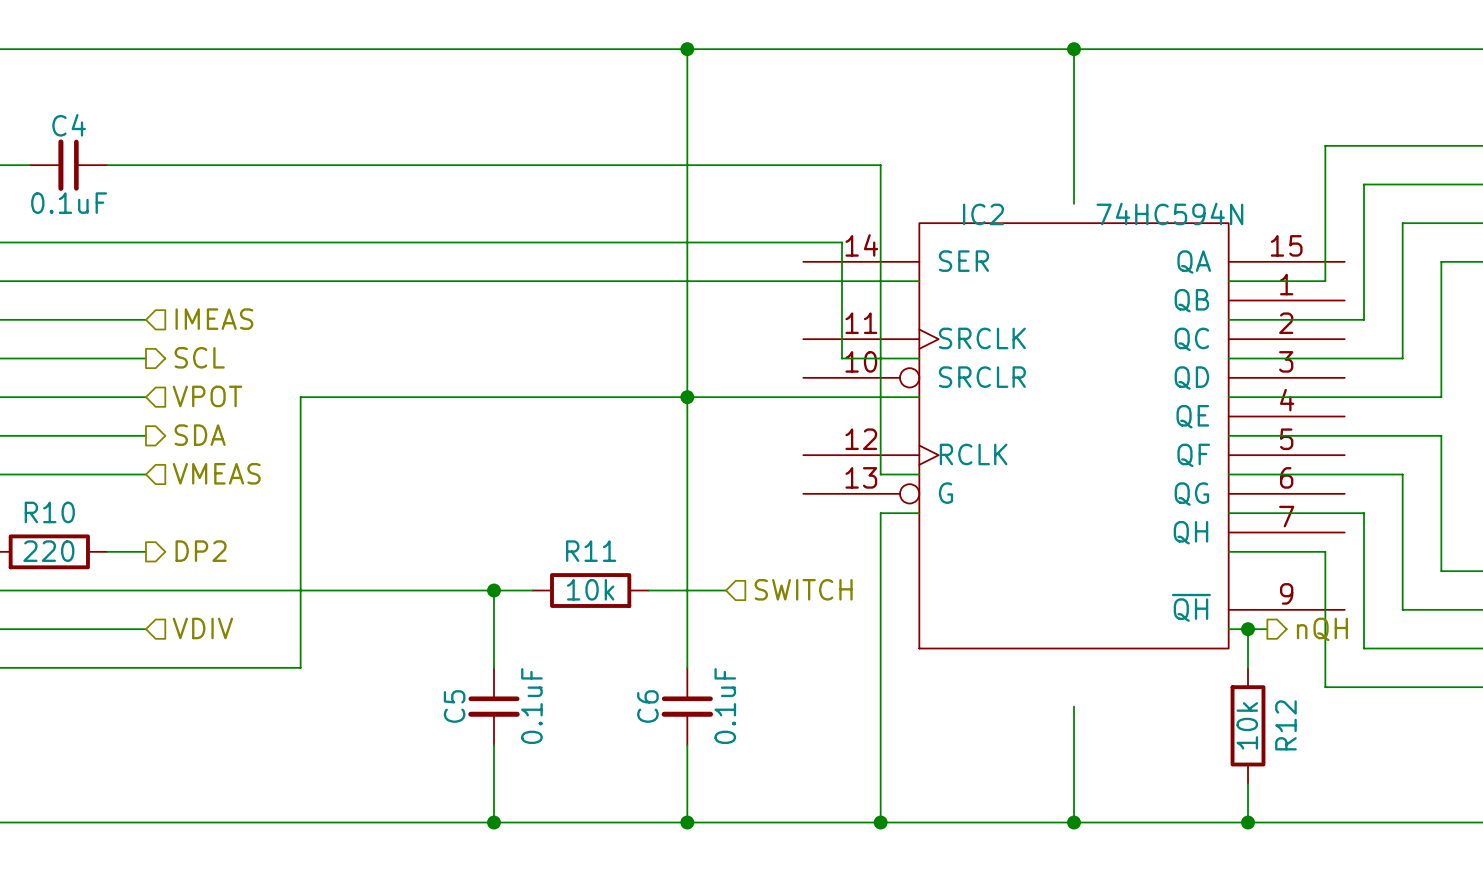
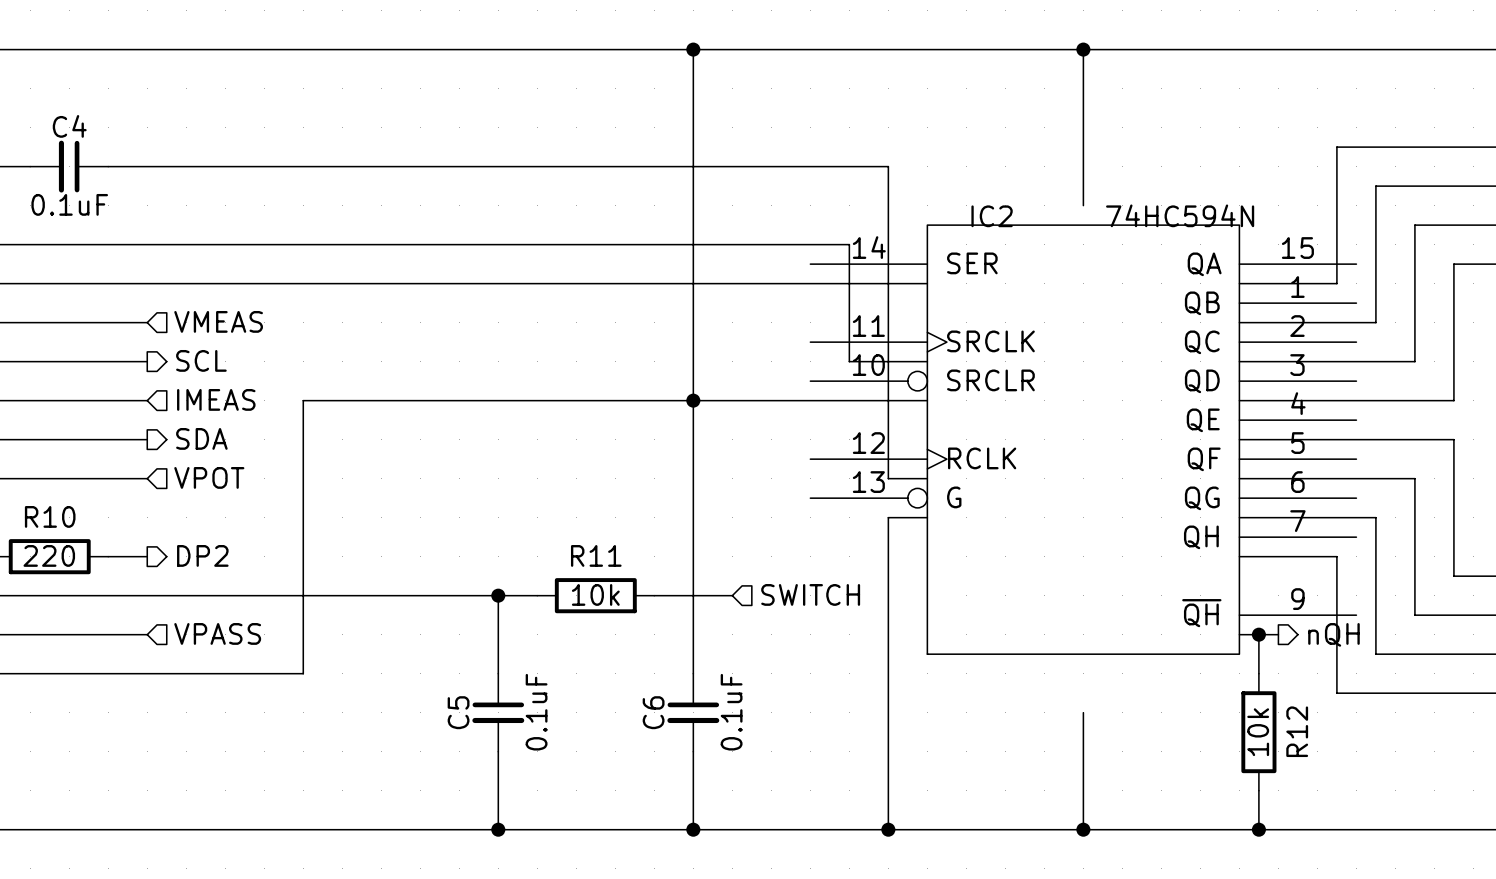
hierarchical label: IMEAS (214, 319) -> VMEAS (218, 321)
hierarchical label: VPOT (207, 396) -> IMEAS (216, 399)
hierarchical label: VMEAS (216, 473) -> VPOT (209, 477)
hierarchical label: VDIV (202, 628) -> VPASS (217, 633)

